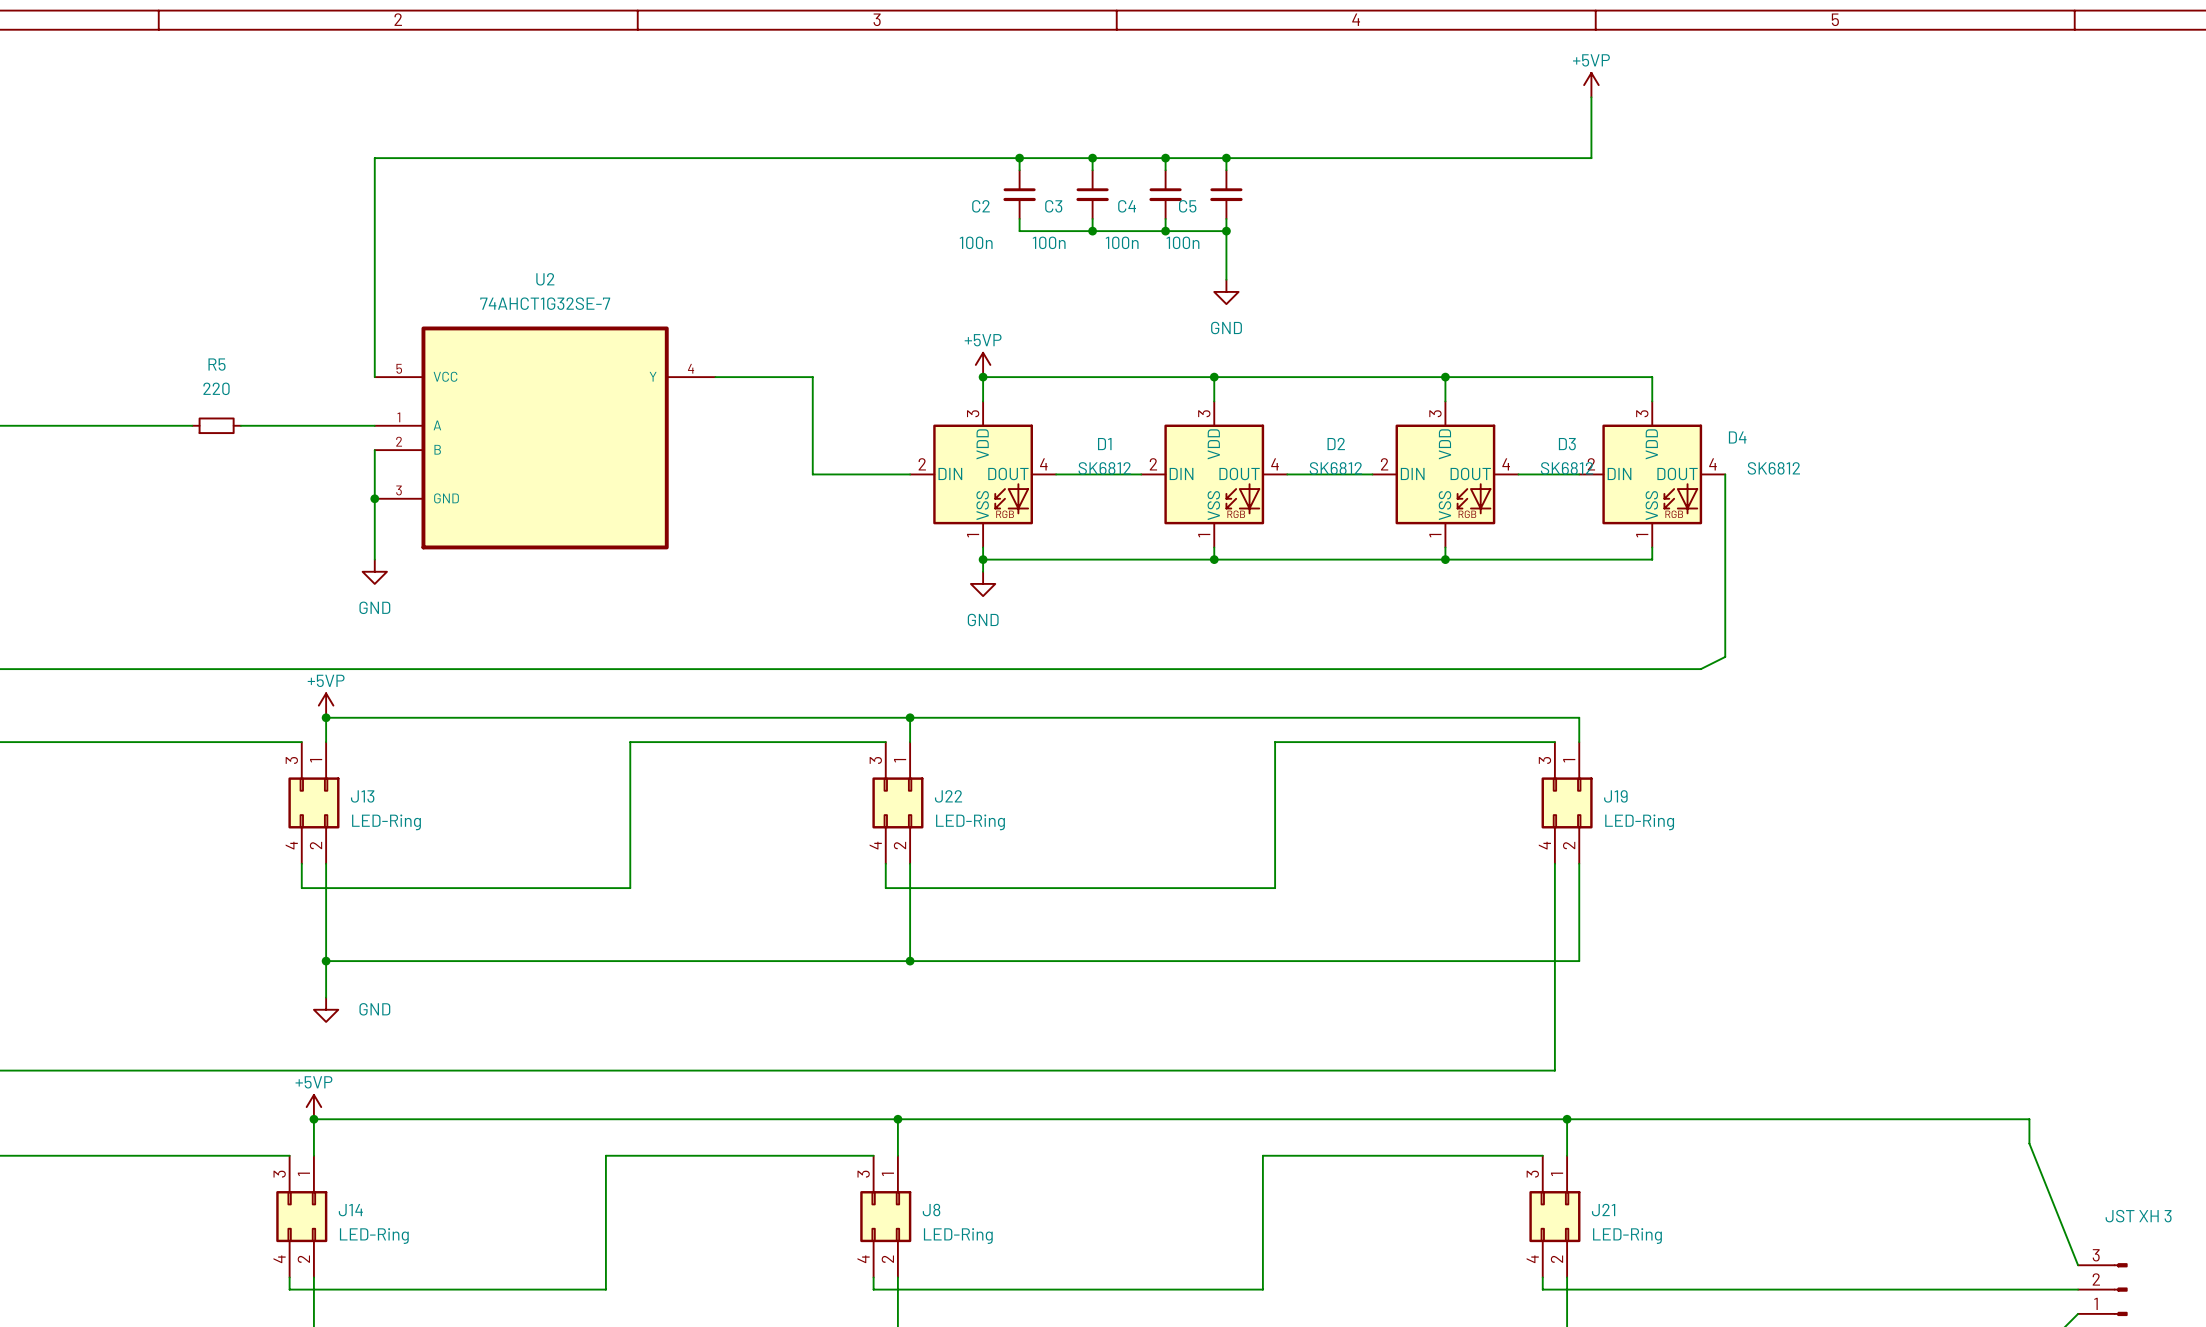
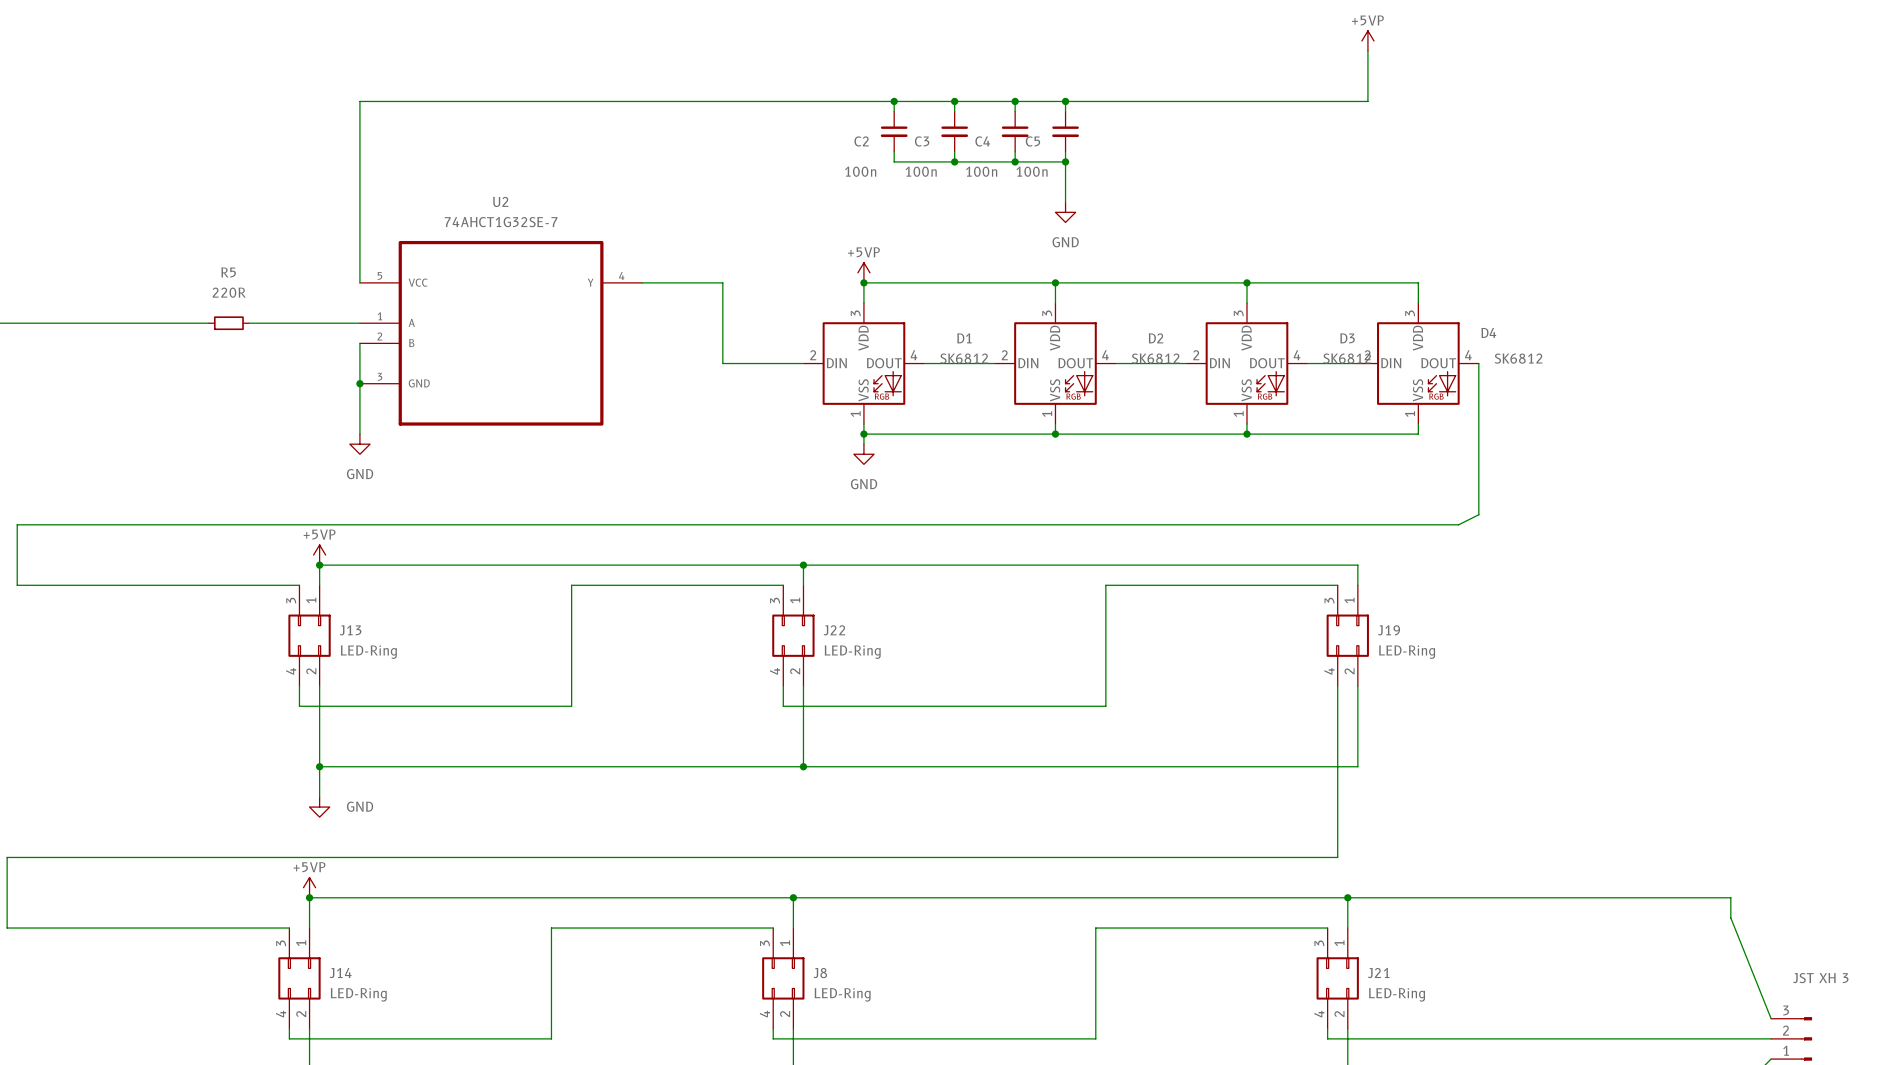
R5 value: 220 (216, 388) -> 220R (229, 292)

